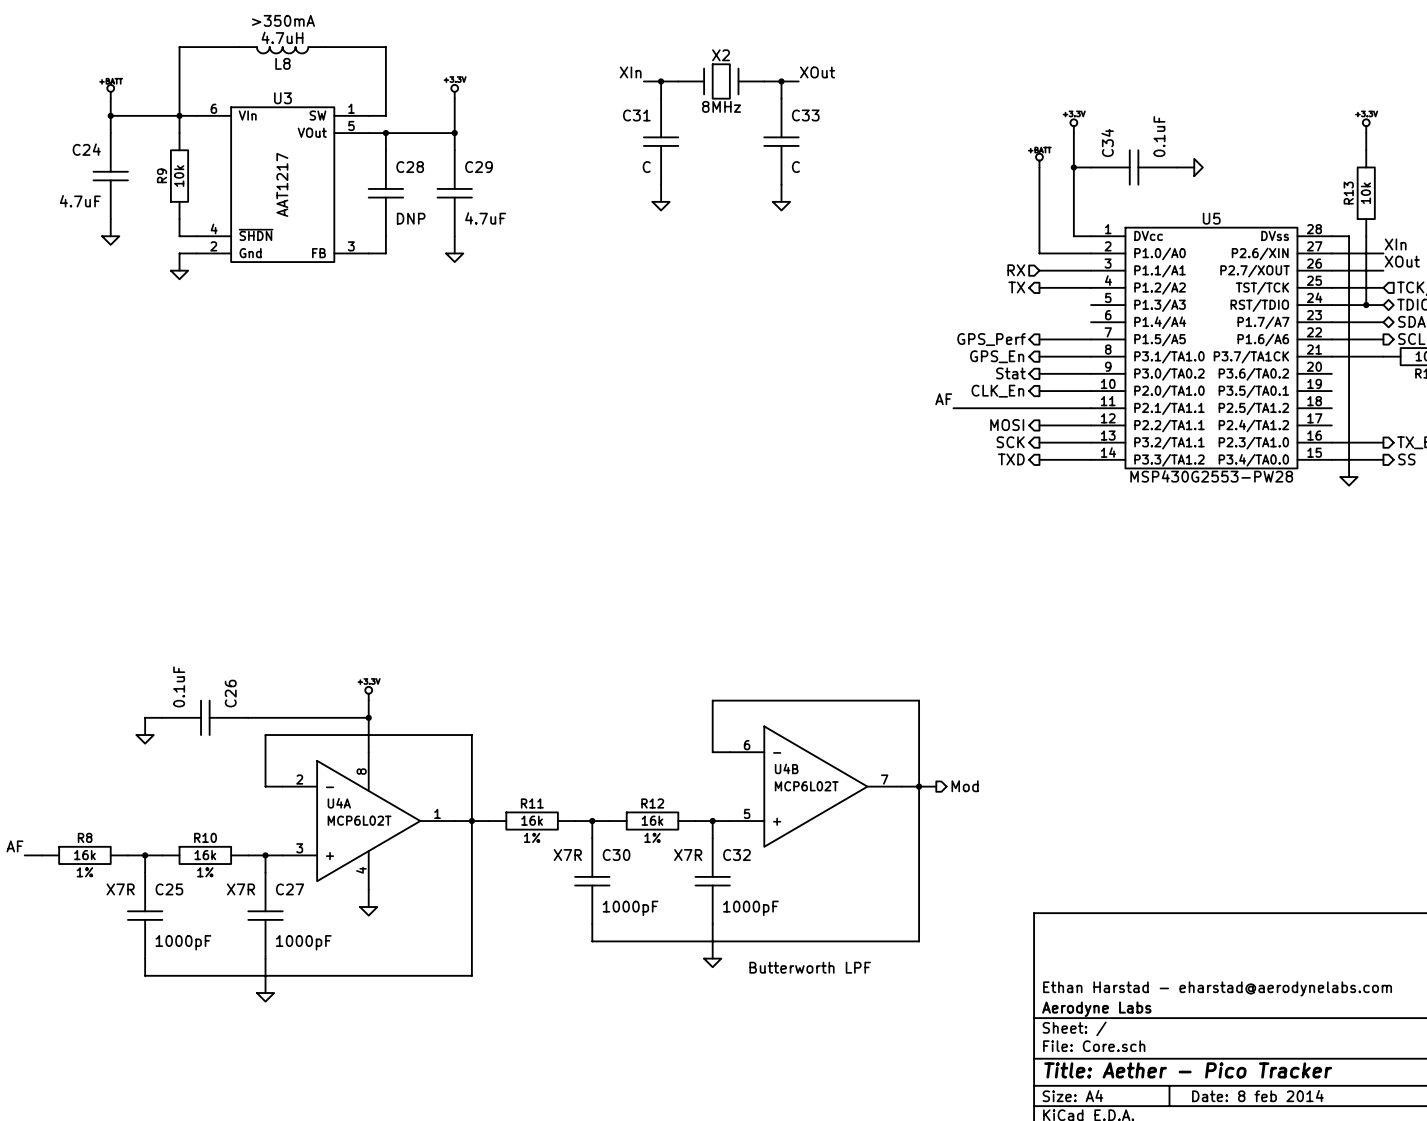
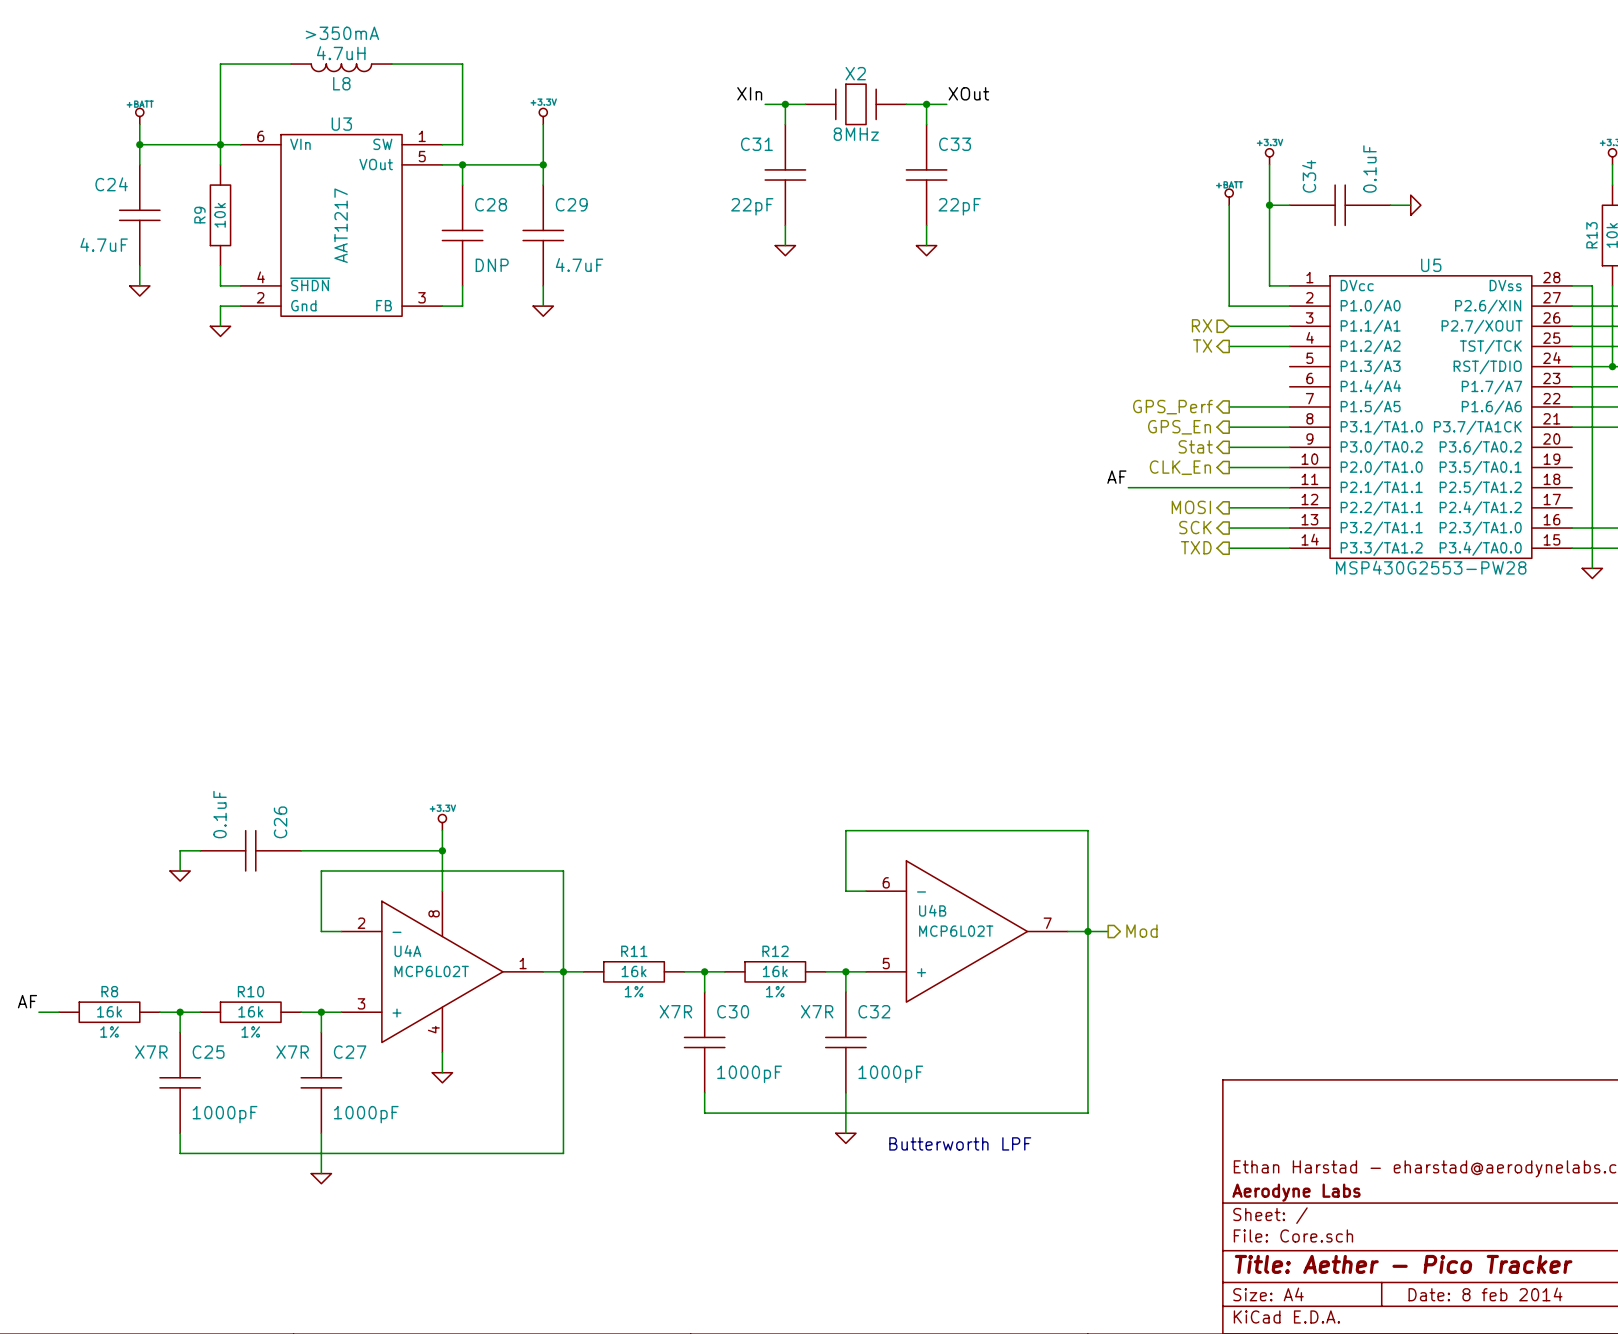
C31 value: C (646, 167) -> 22pF (752, 206)
C33 value: C (795, 167) -> 22pF (959, 206)

